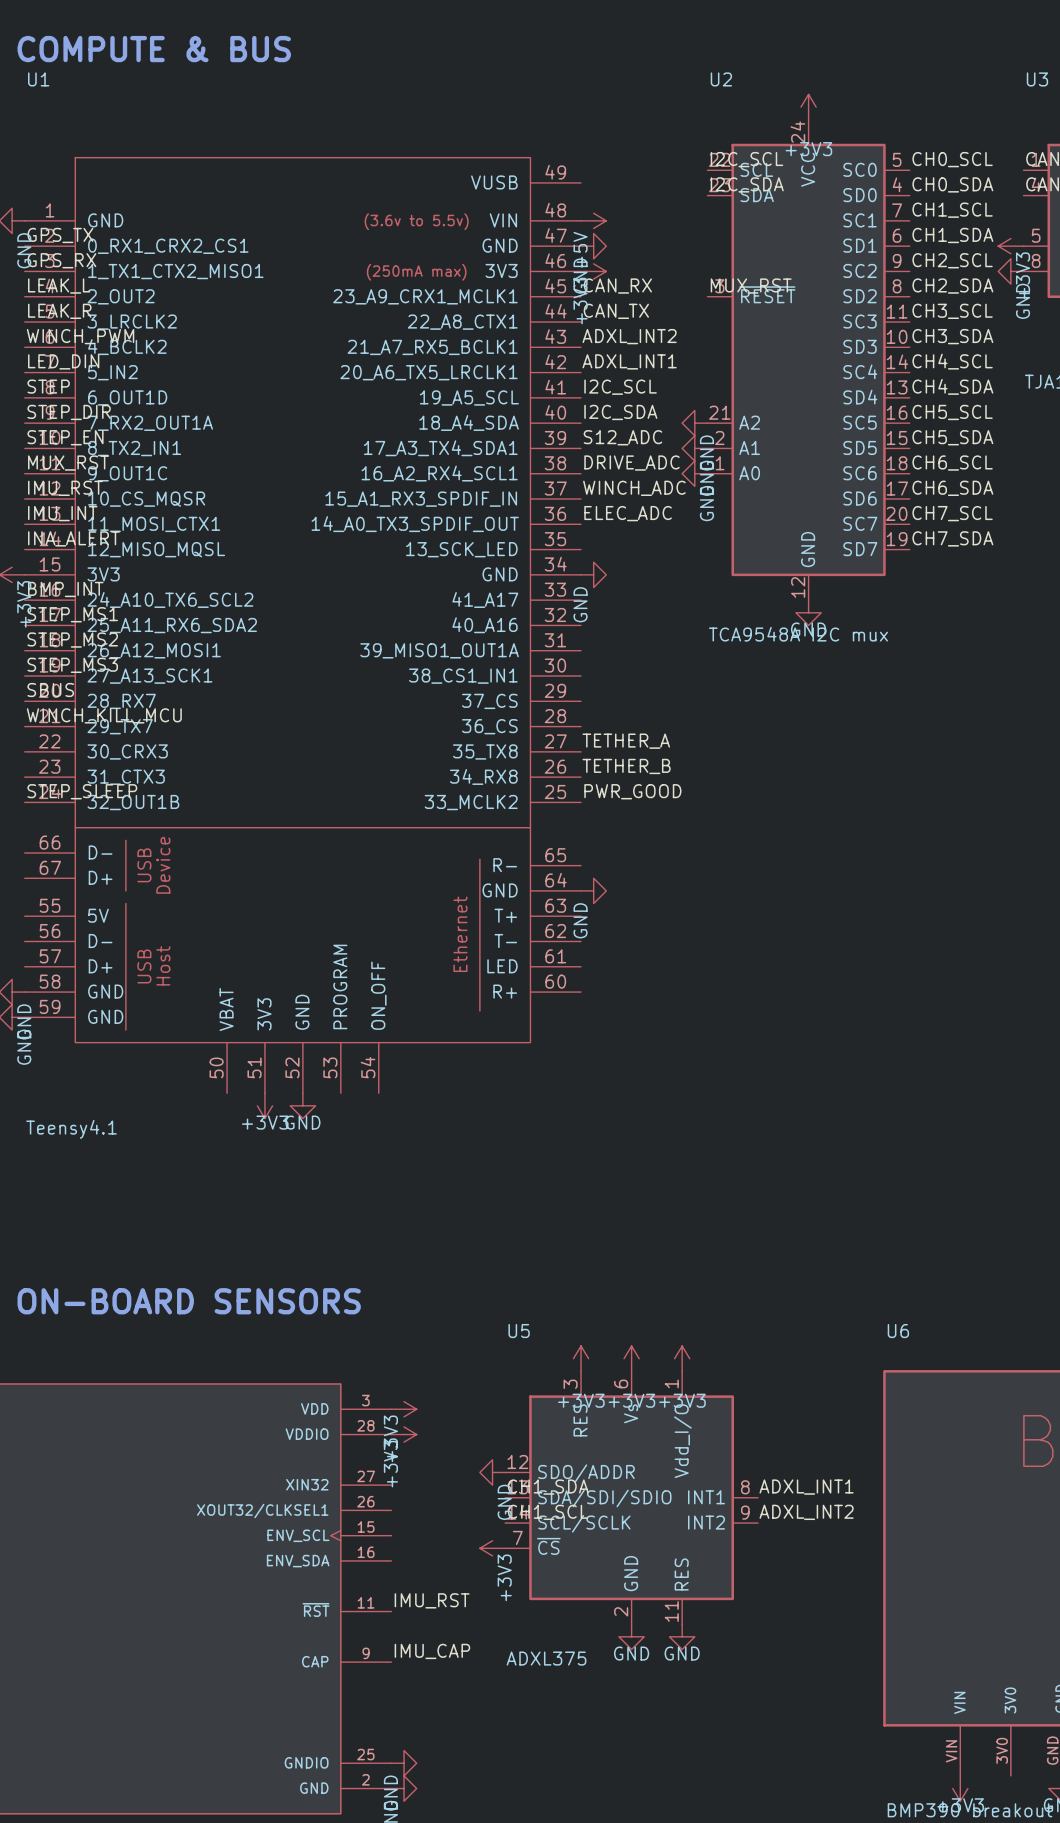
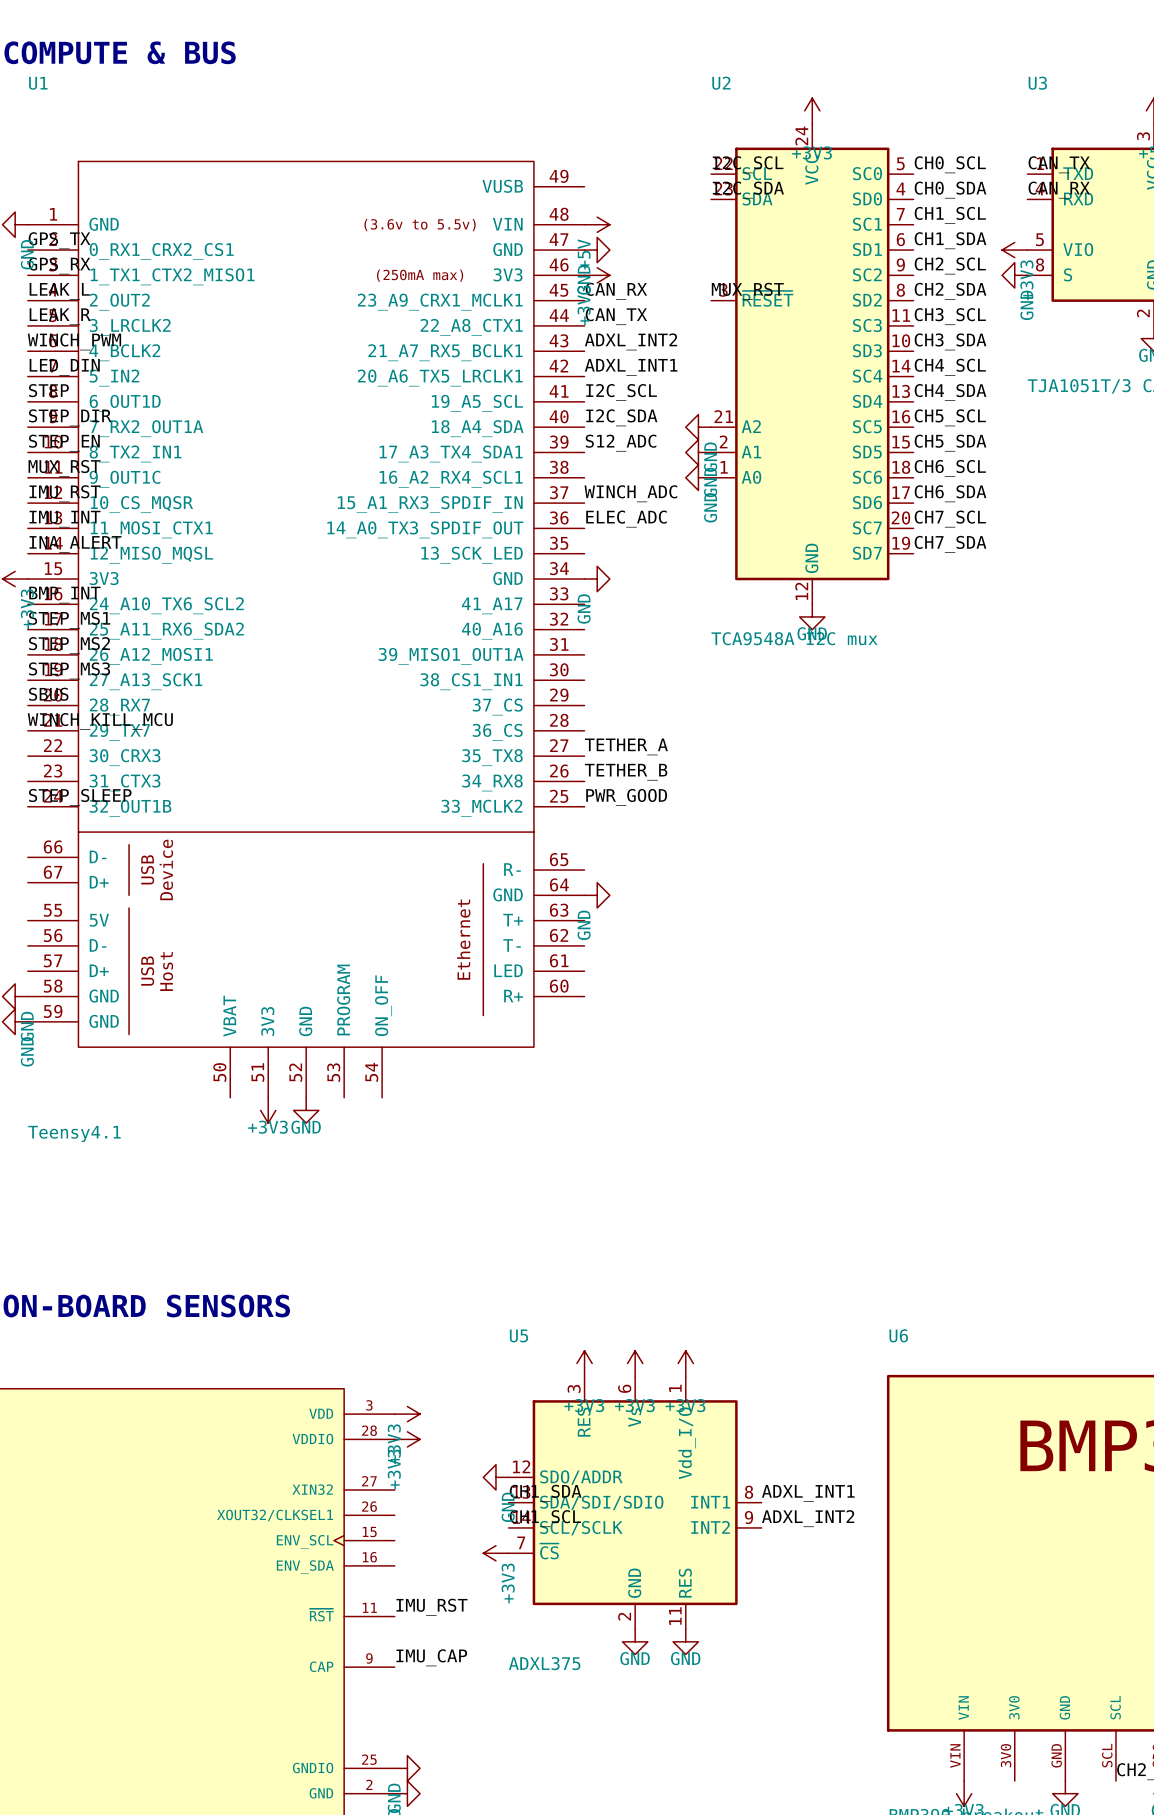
label: DRIVE_ADC (631, 463) -> none

